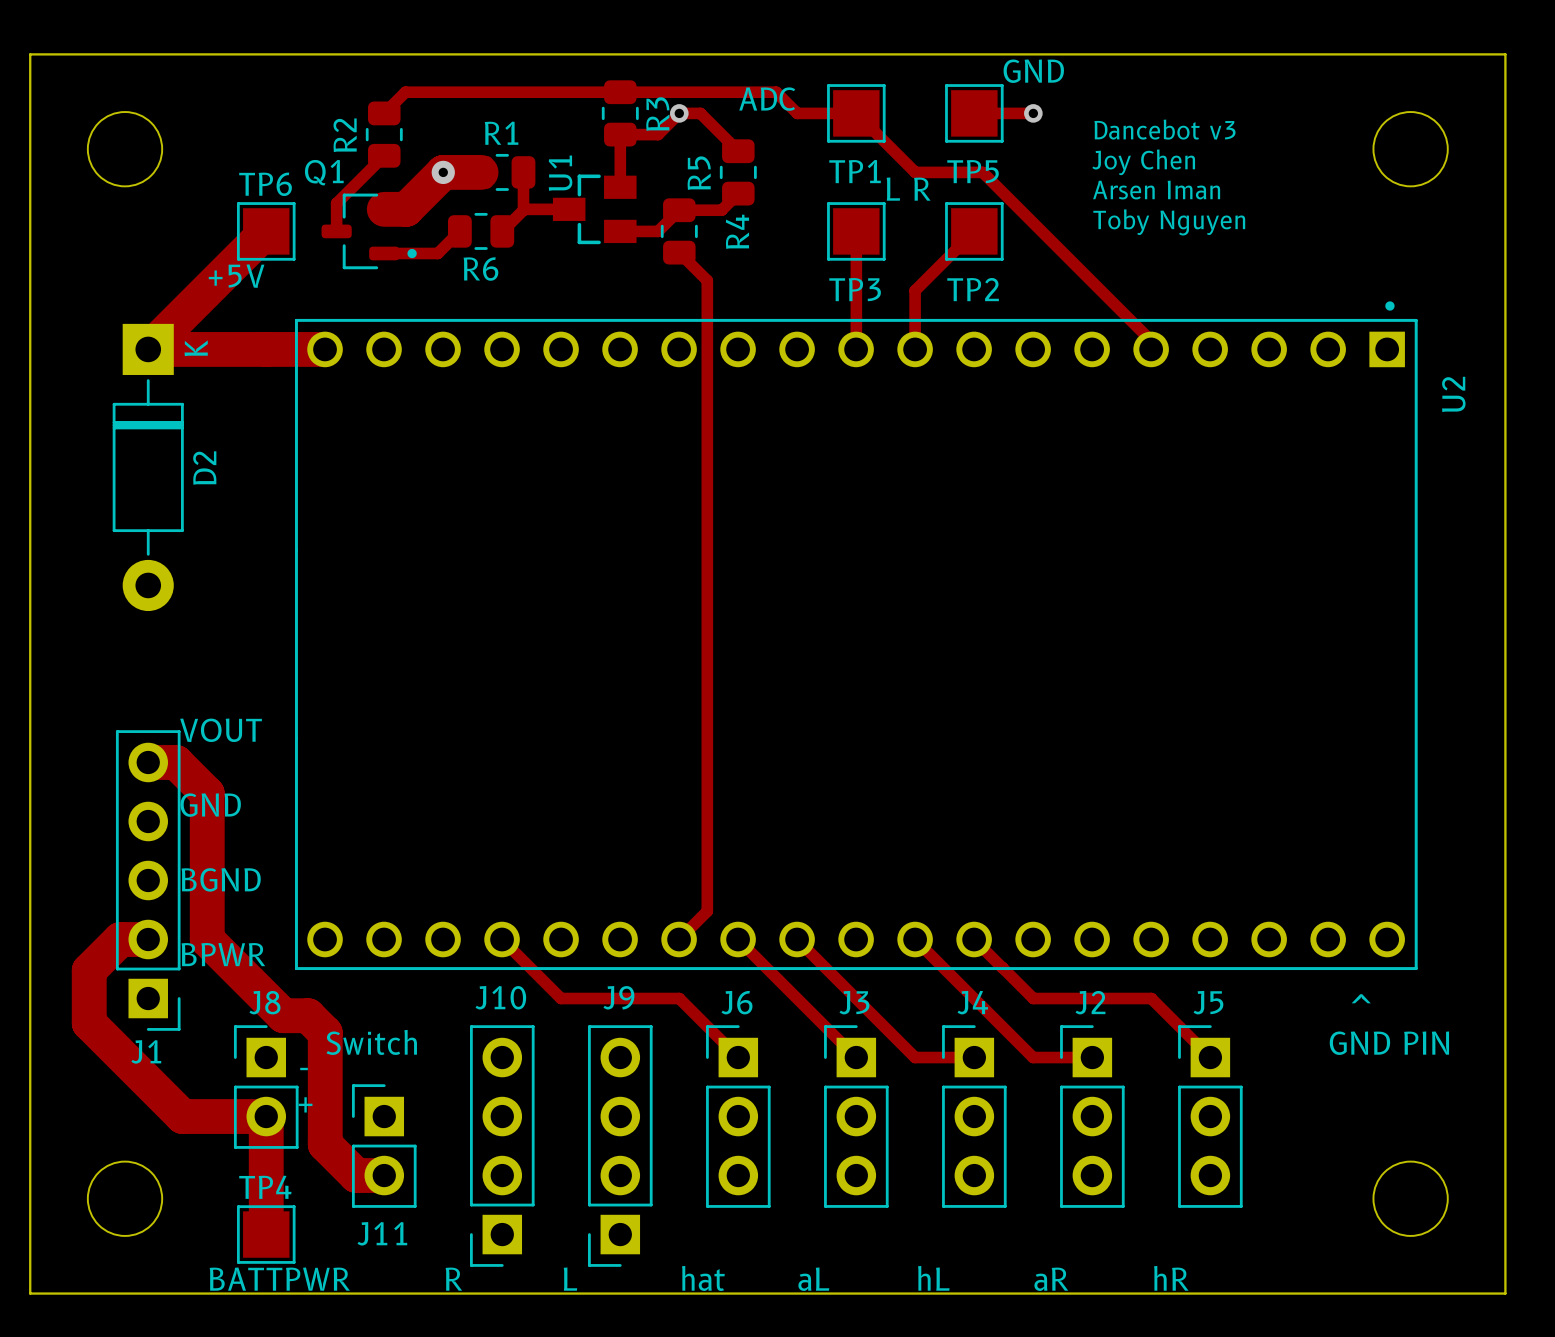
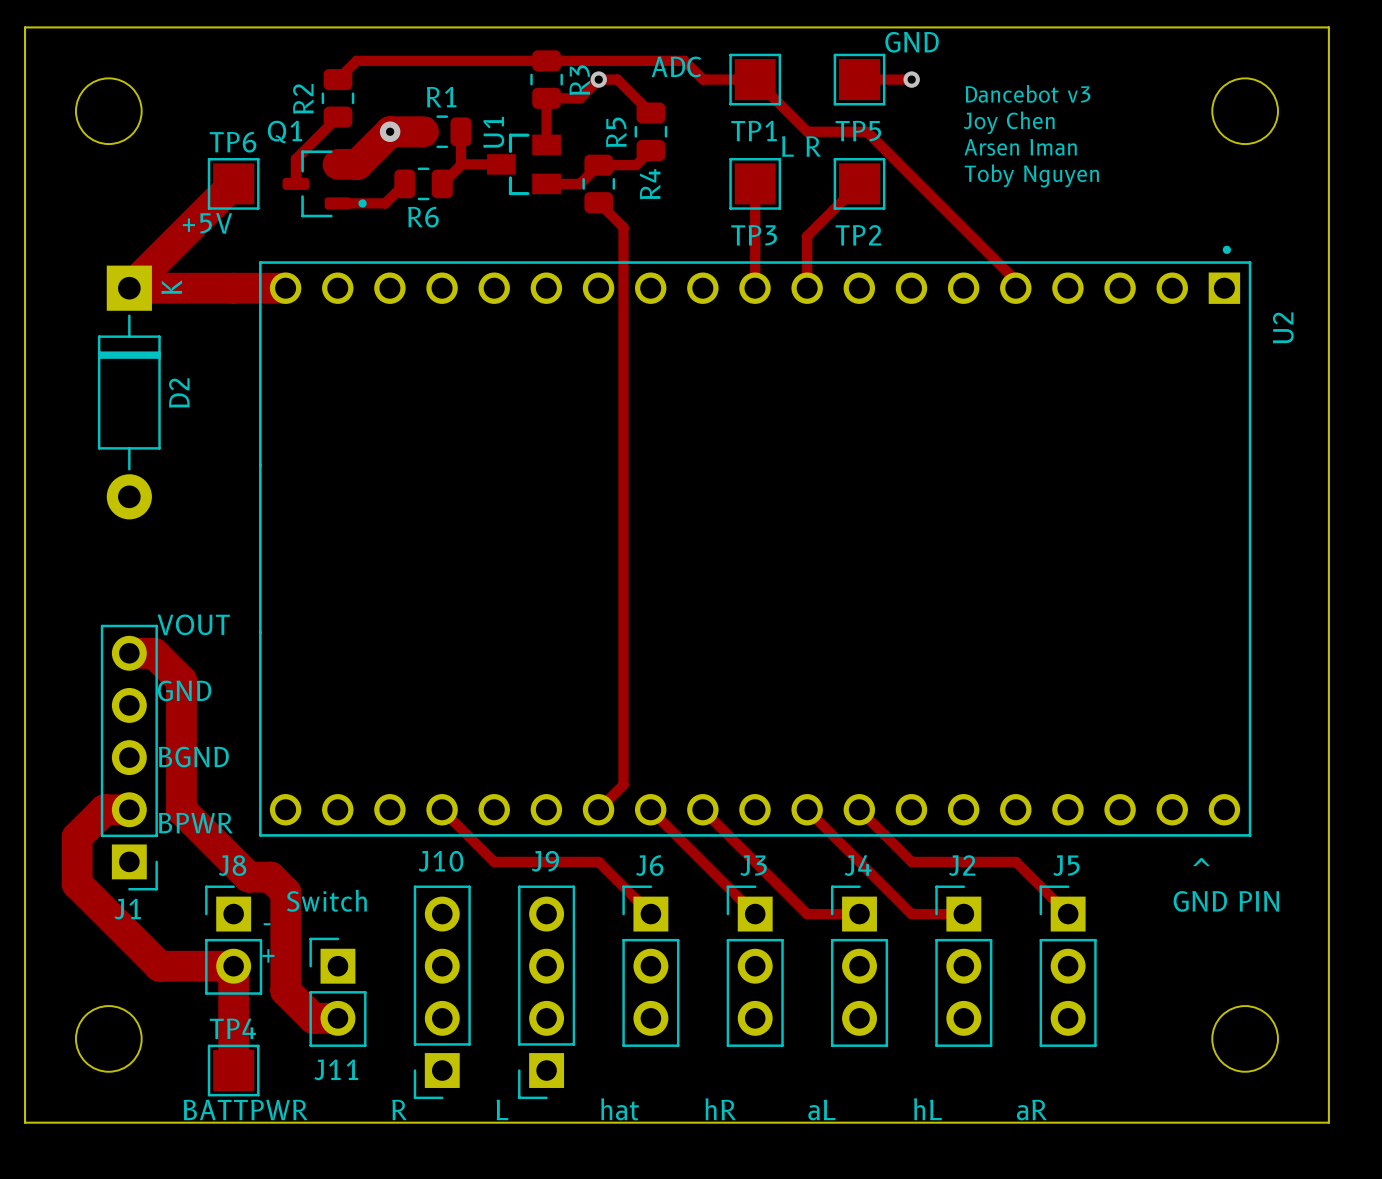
text: hL (933, 1278) -> aL (821, 1110)
text: hR (1171, 1278) -> aR (1031, 1110)
text: aL (813, 1279) -> hR (720, 1109)
text: aR (1051, 1279) -> hL (928, 1109)

